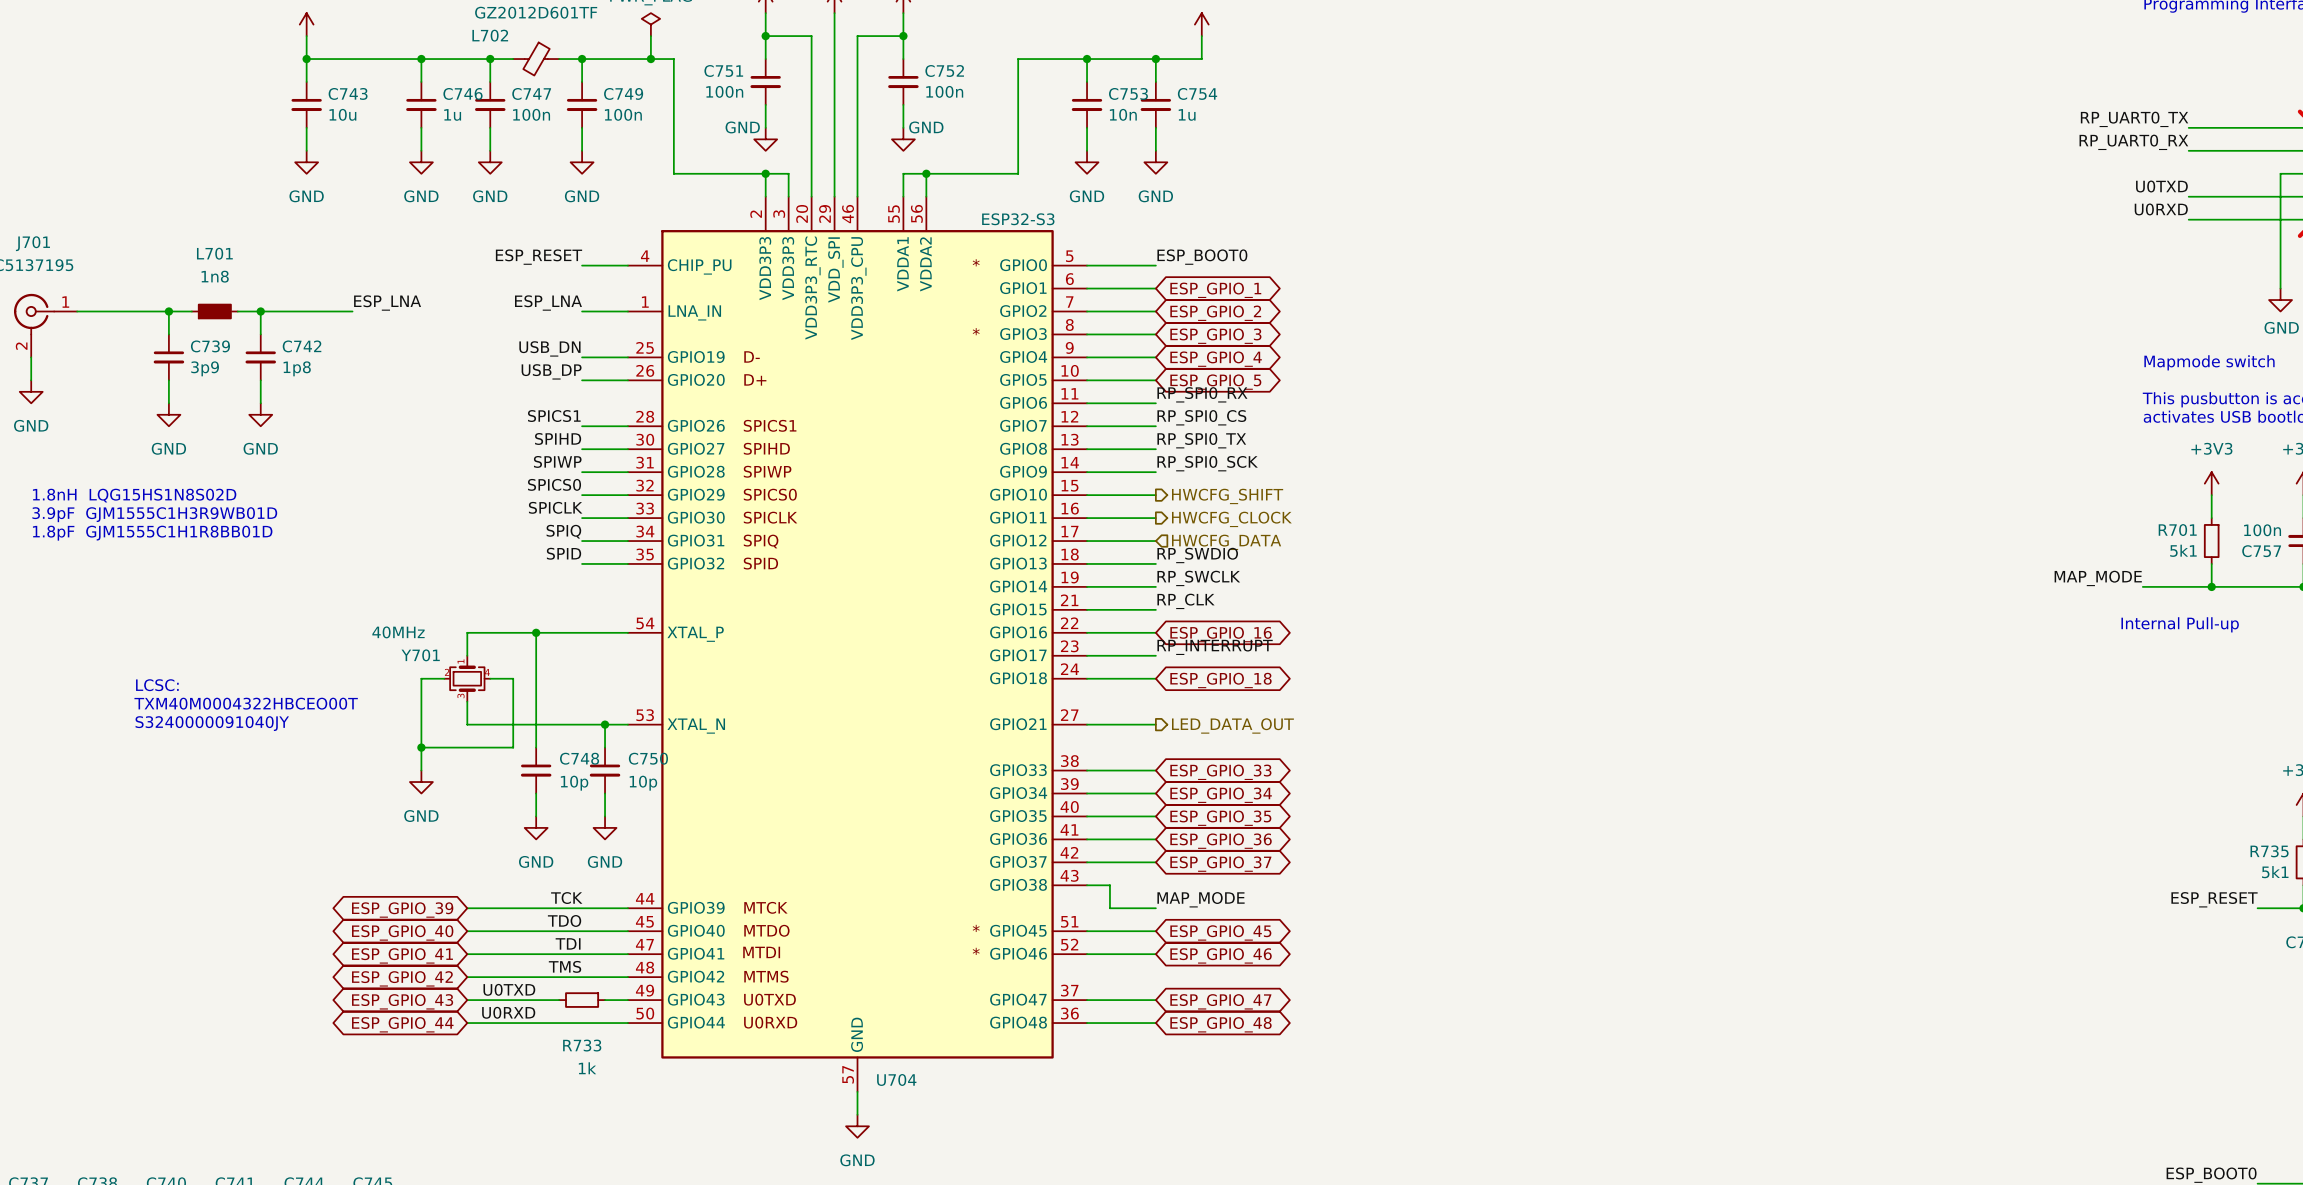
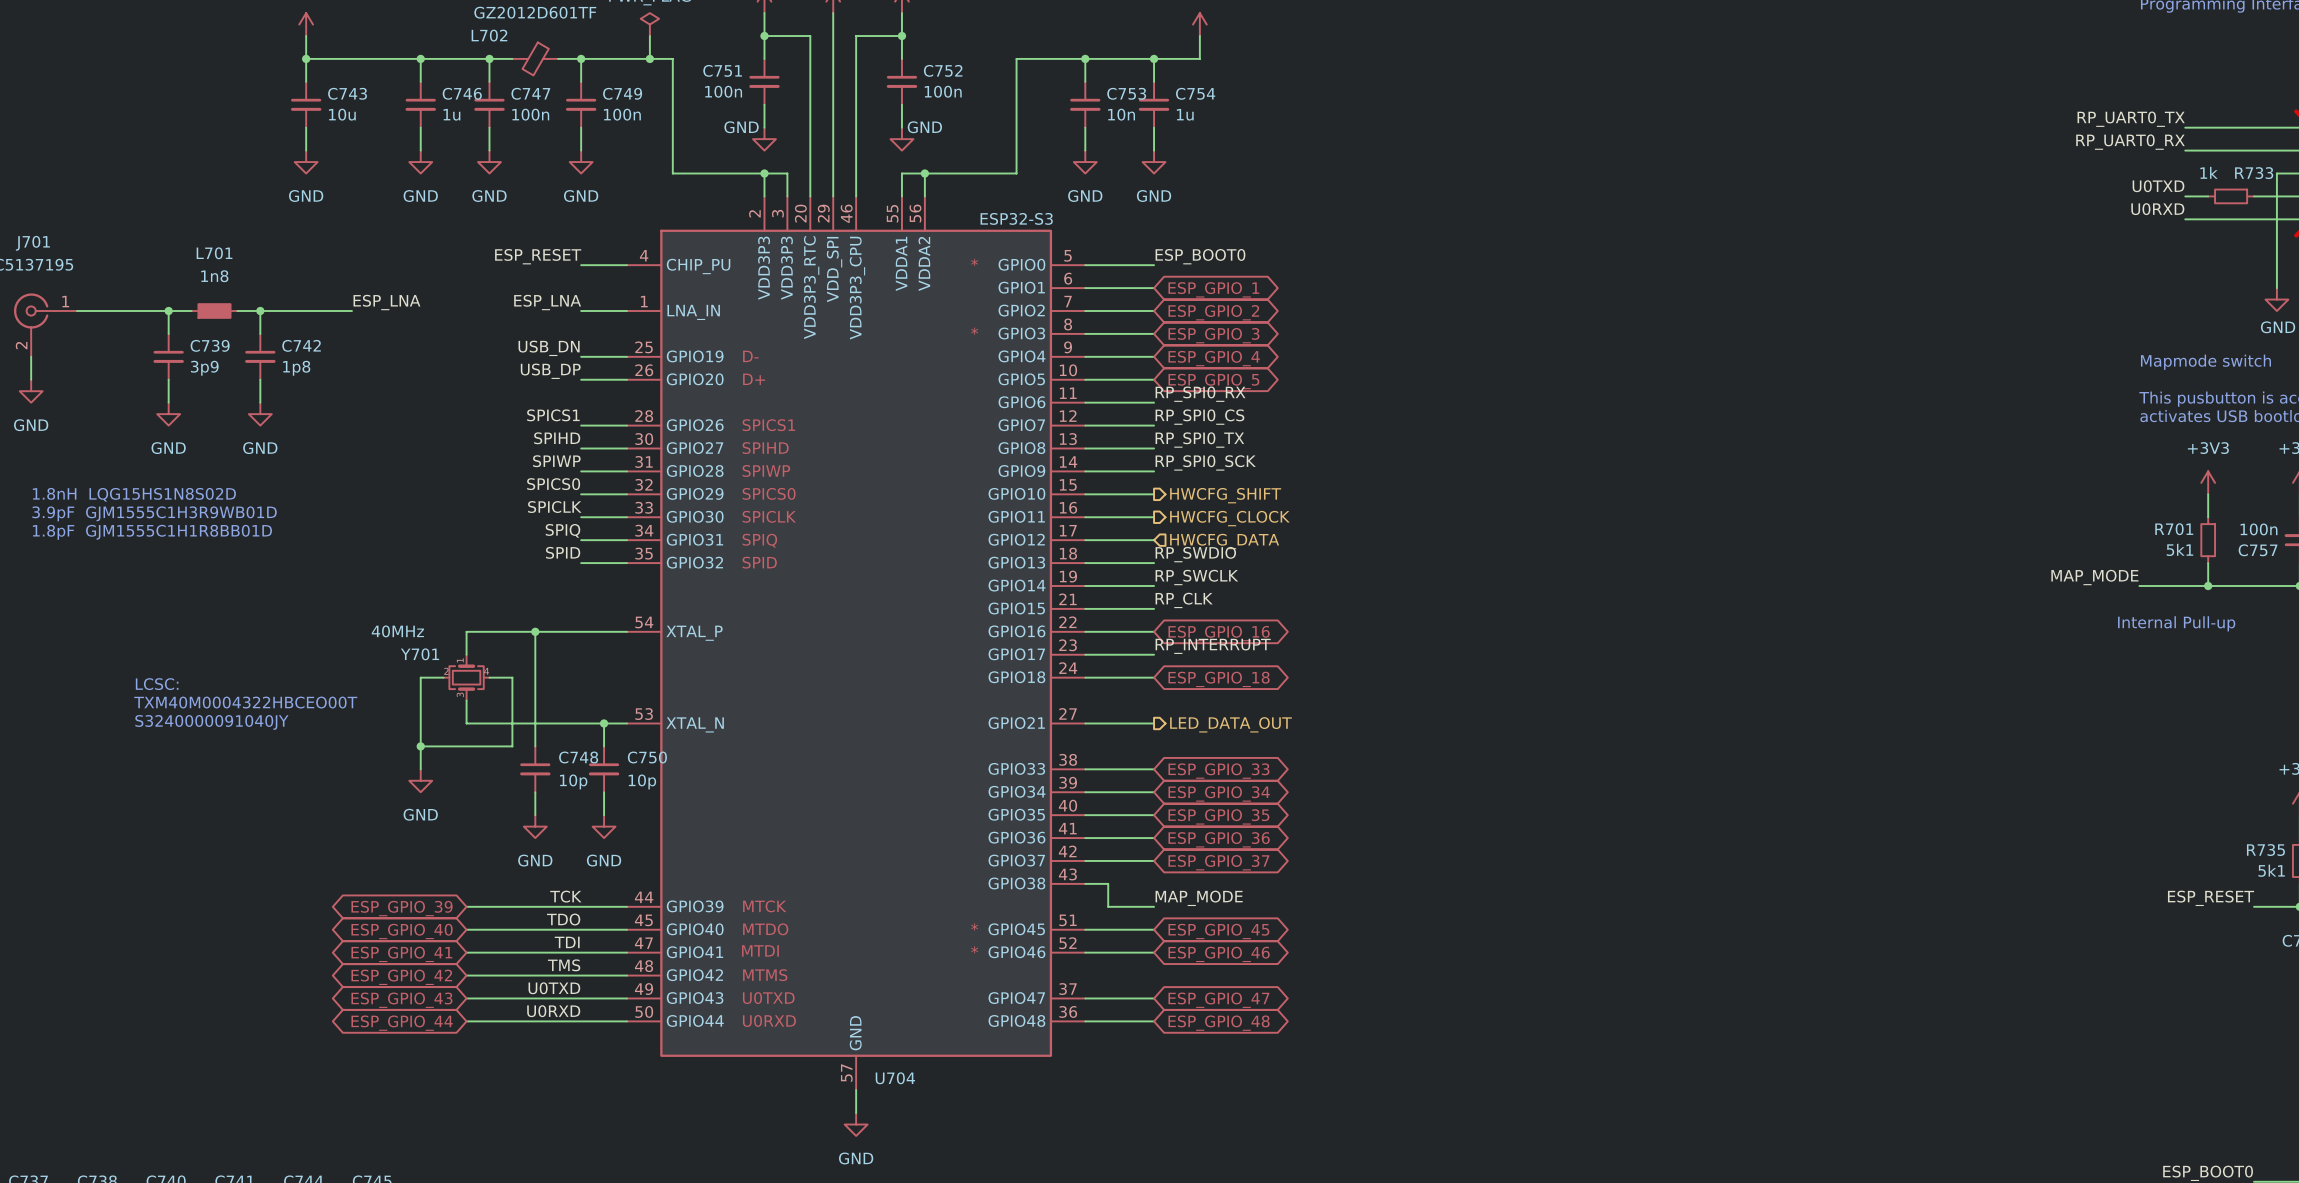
wire: (2211, 196) (2257, 196) -> none
label position: U0TXD (509, 989) -> U0TXD (554, 988)
wire: none -> (558, 998) (604, 998)
R733 position: (582, 1000) -> (2231, 196)
label position: U0RXD (508, 1012) -> U0RXD (553, 1011)
R733 name position: R733 (582, 1045) -> R733 (2254, 173)
R733 value position: 1k (587, 1068) -> 1k (2209, 172)

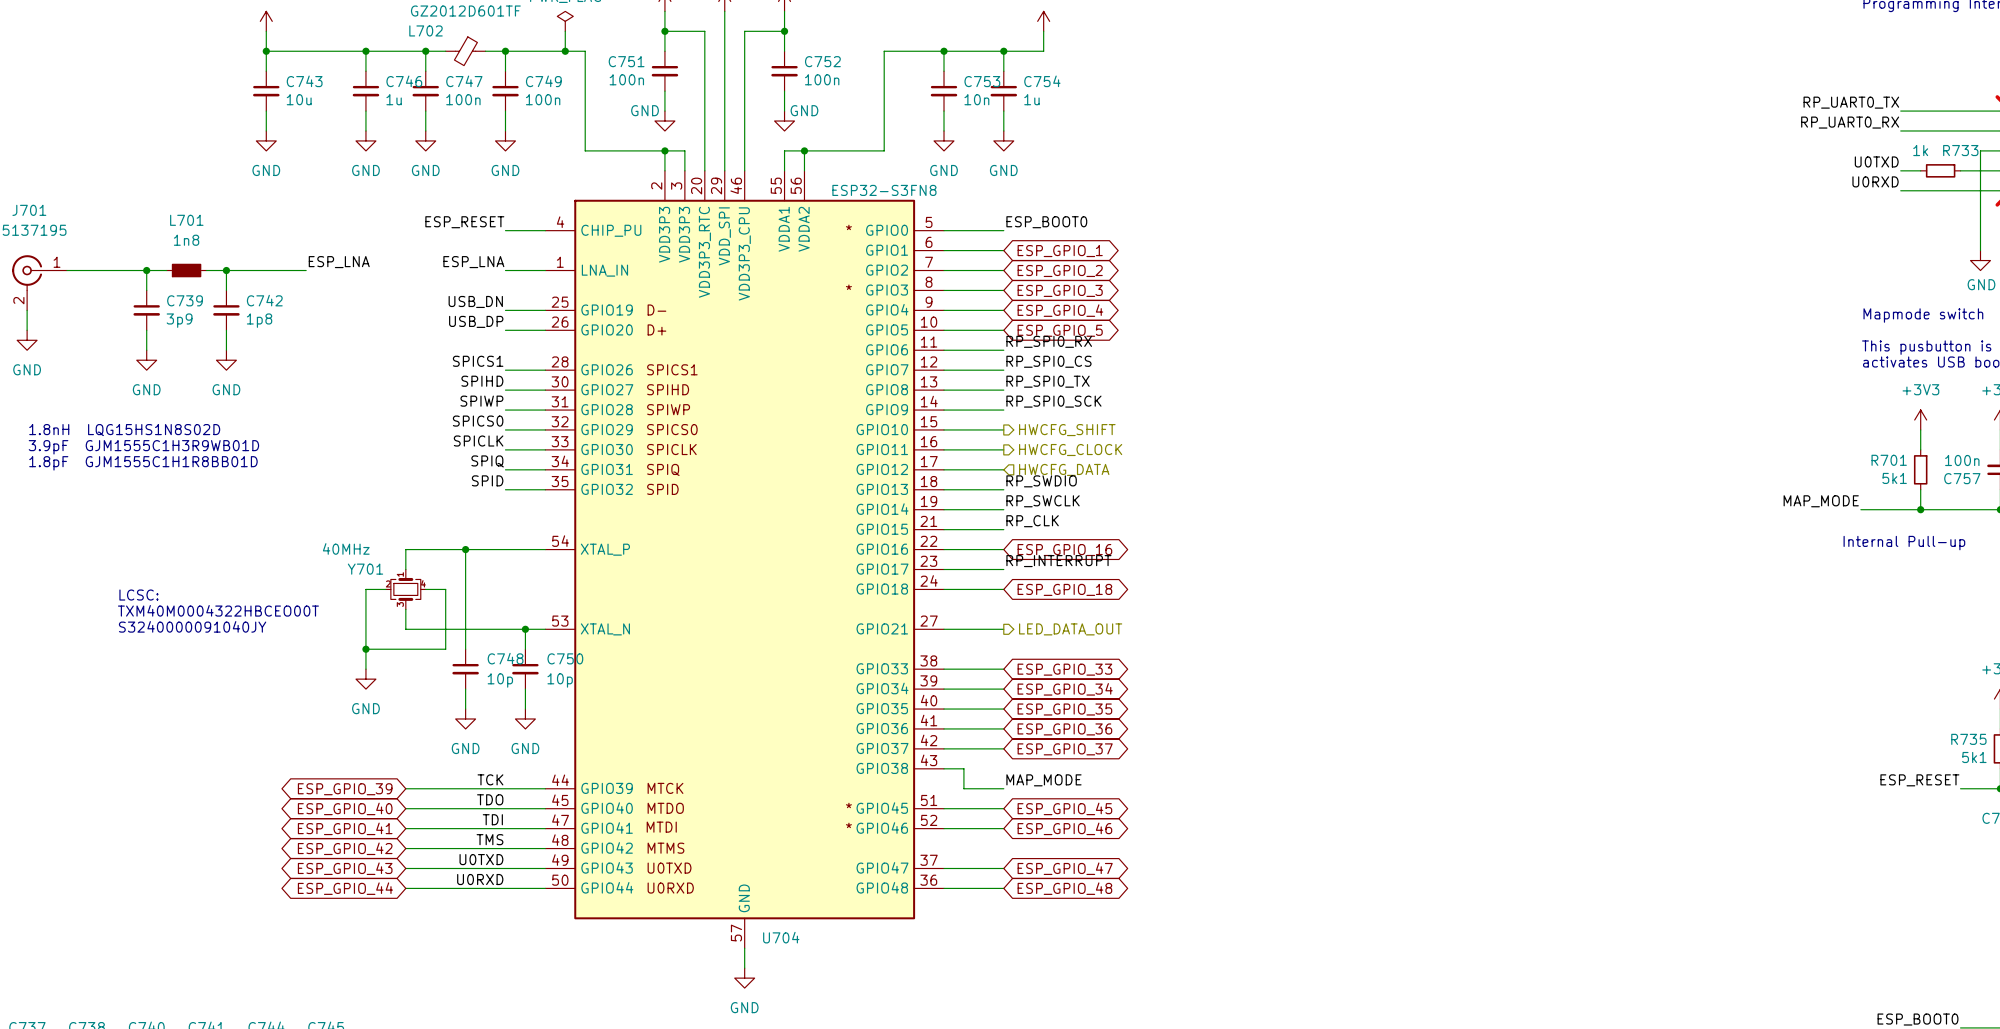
U704 value: ESP32-S3 (1016, 218) -> ESP32-S3FN8 (884, 190)

